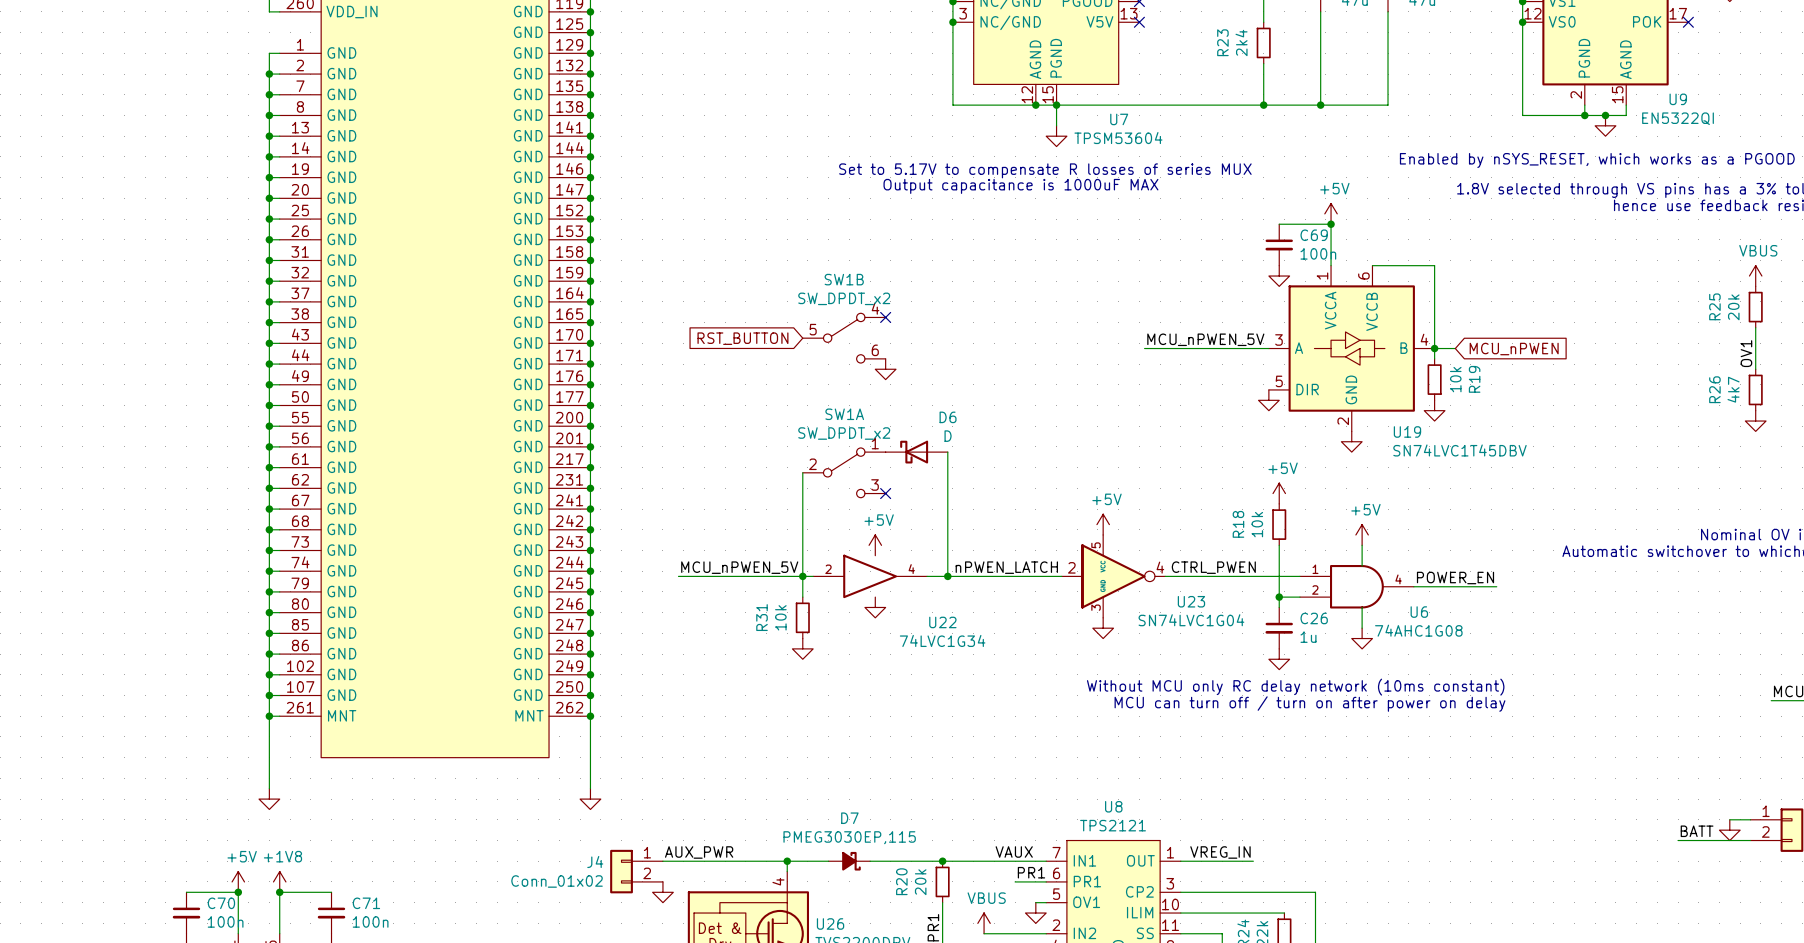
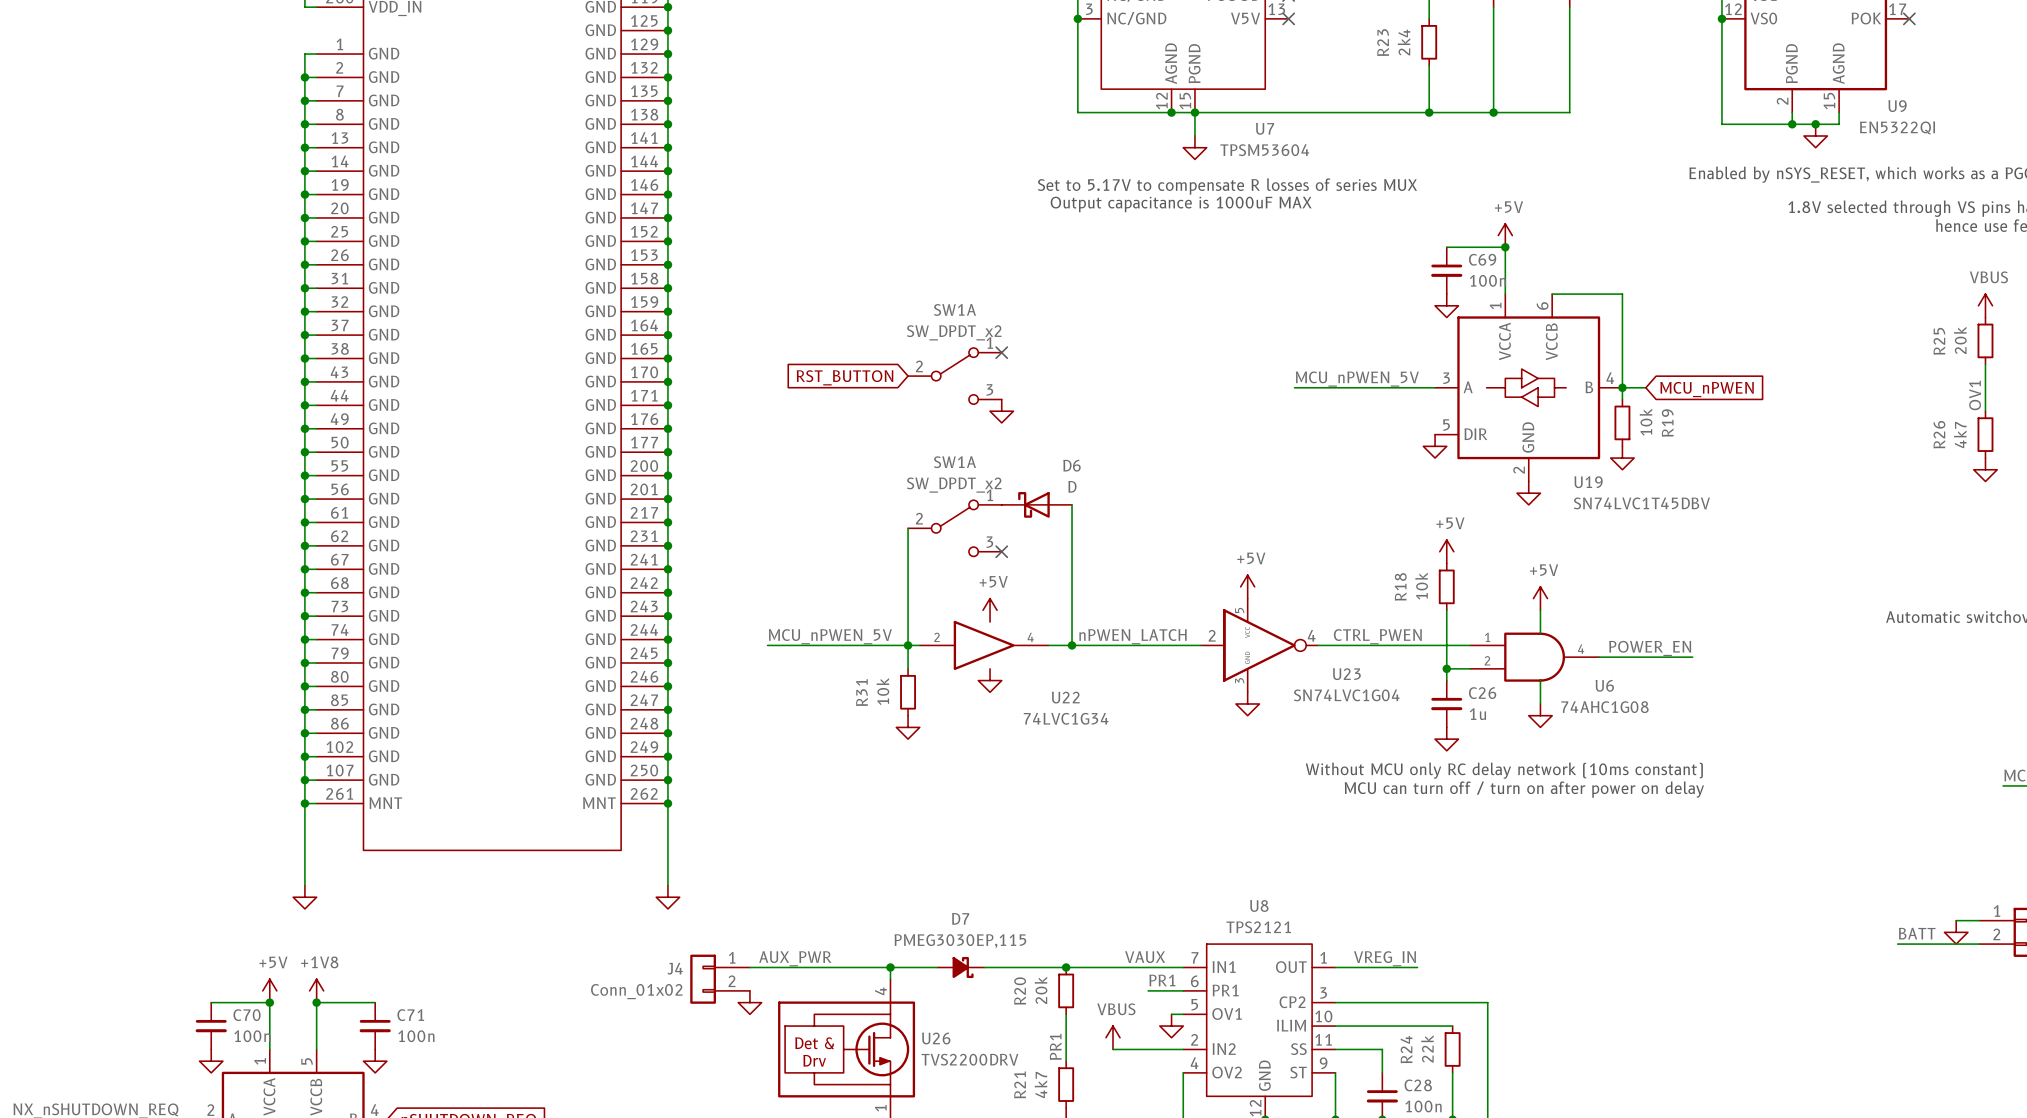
SW1B name: SW1B (844, 279) -> SW1A (954, 309)
SW1B pin number: 4 (875, 308) -> 1 (989, 342)
SW1B pin number: 5 (813, 329) -> 2 (919, 366)
SW1B pin number: 6 (875, 350) -> 3 (989, 389)

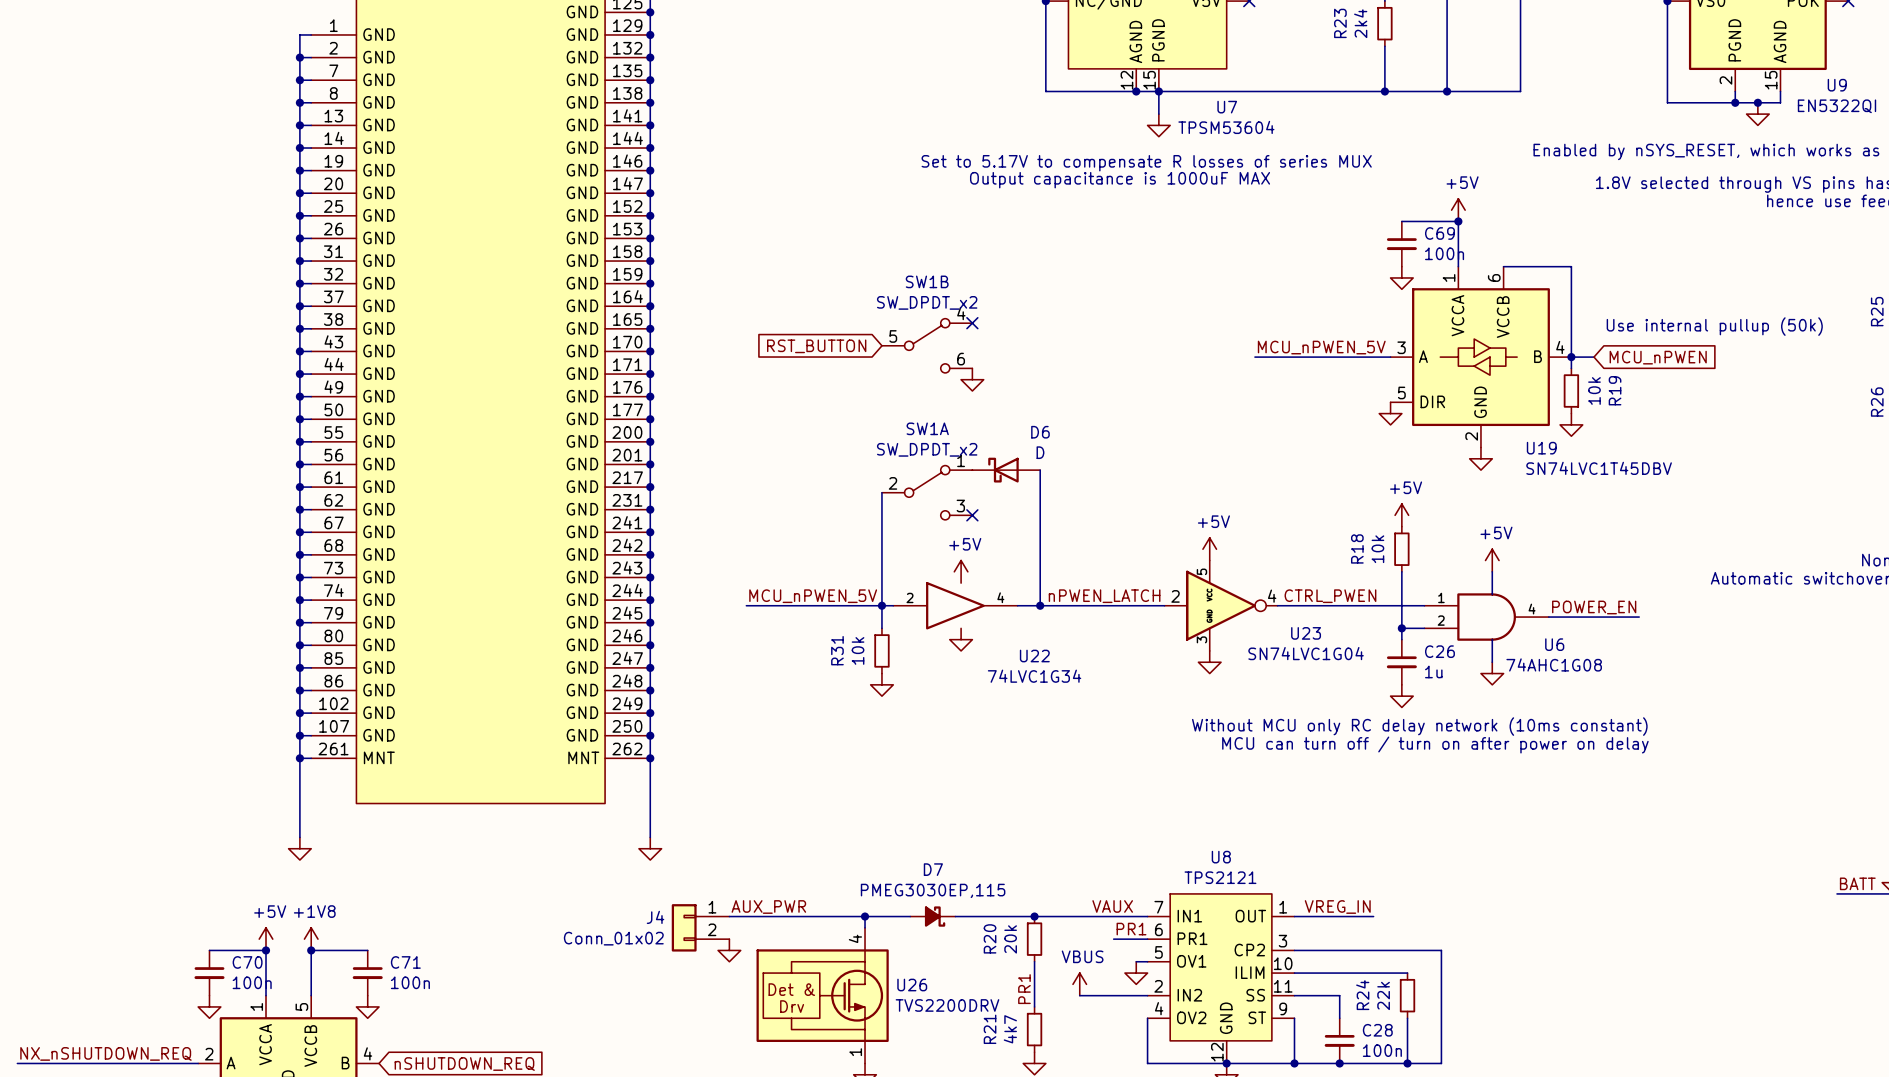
SW1A name: SW1A (954, 309) -> SW1B (927, 281)
SW1A pin number: 1 (989, 342) -> 4 (961, 313)
text: none -> Use internal pullup (50k) (1714, 326)
SW1A pin number: 2 (919, 366) -> 5 (893, 336)
SW1A pin number: 3 (989, 389) -> 6 (961, 359)

